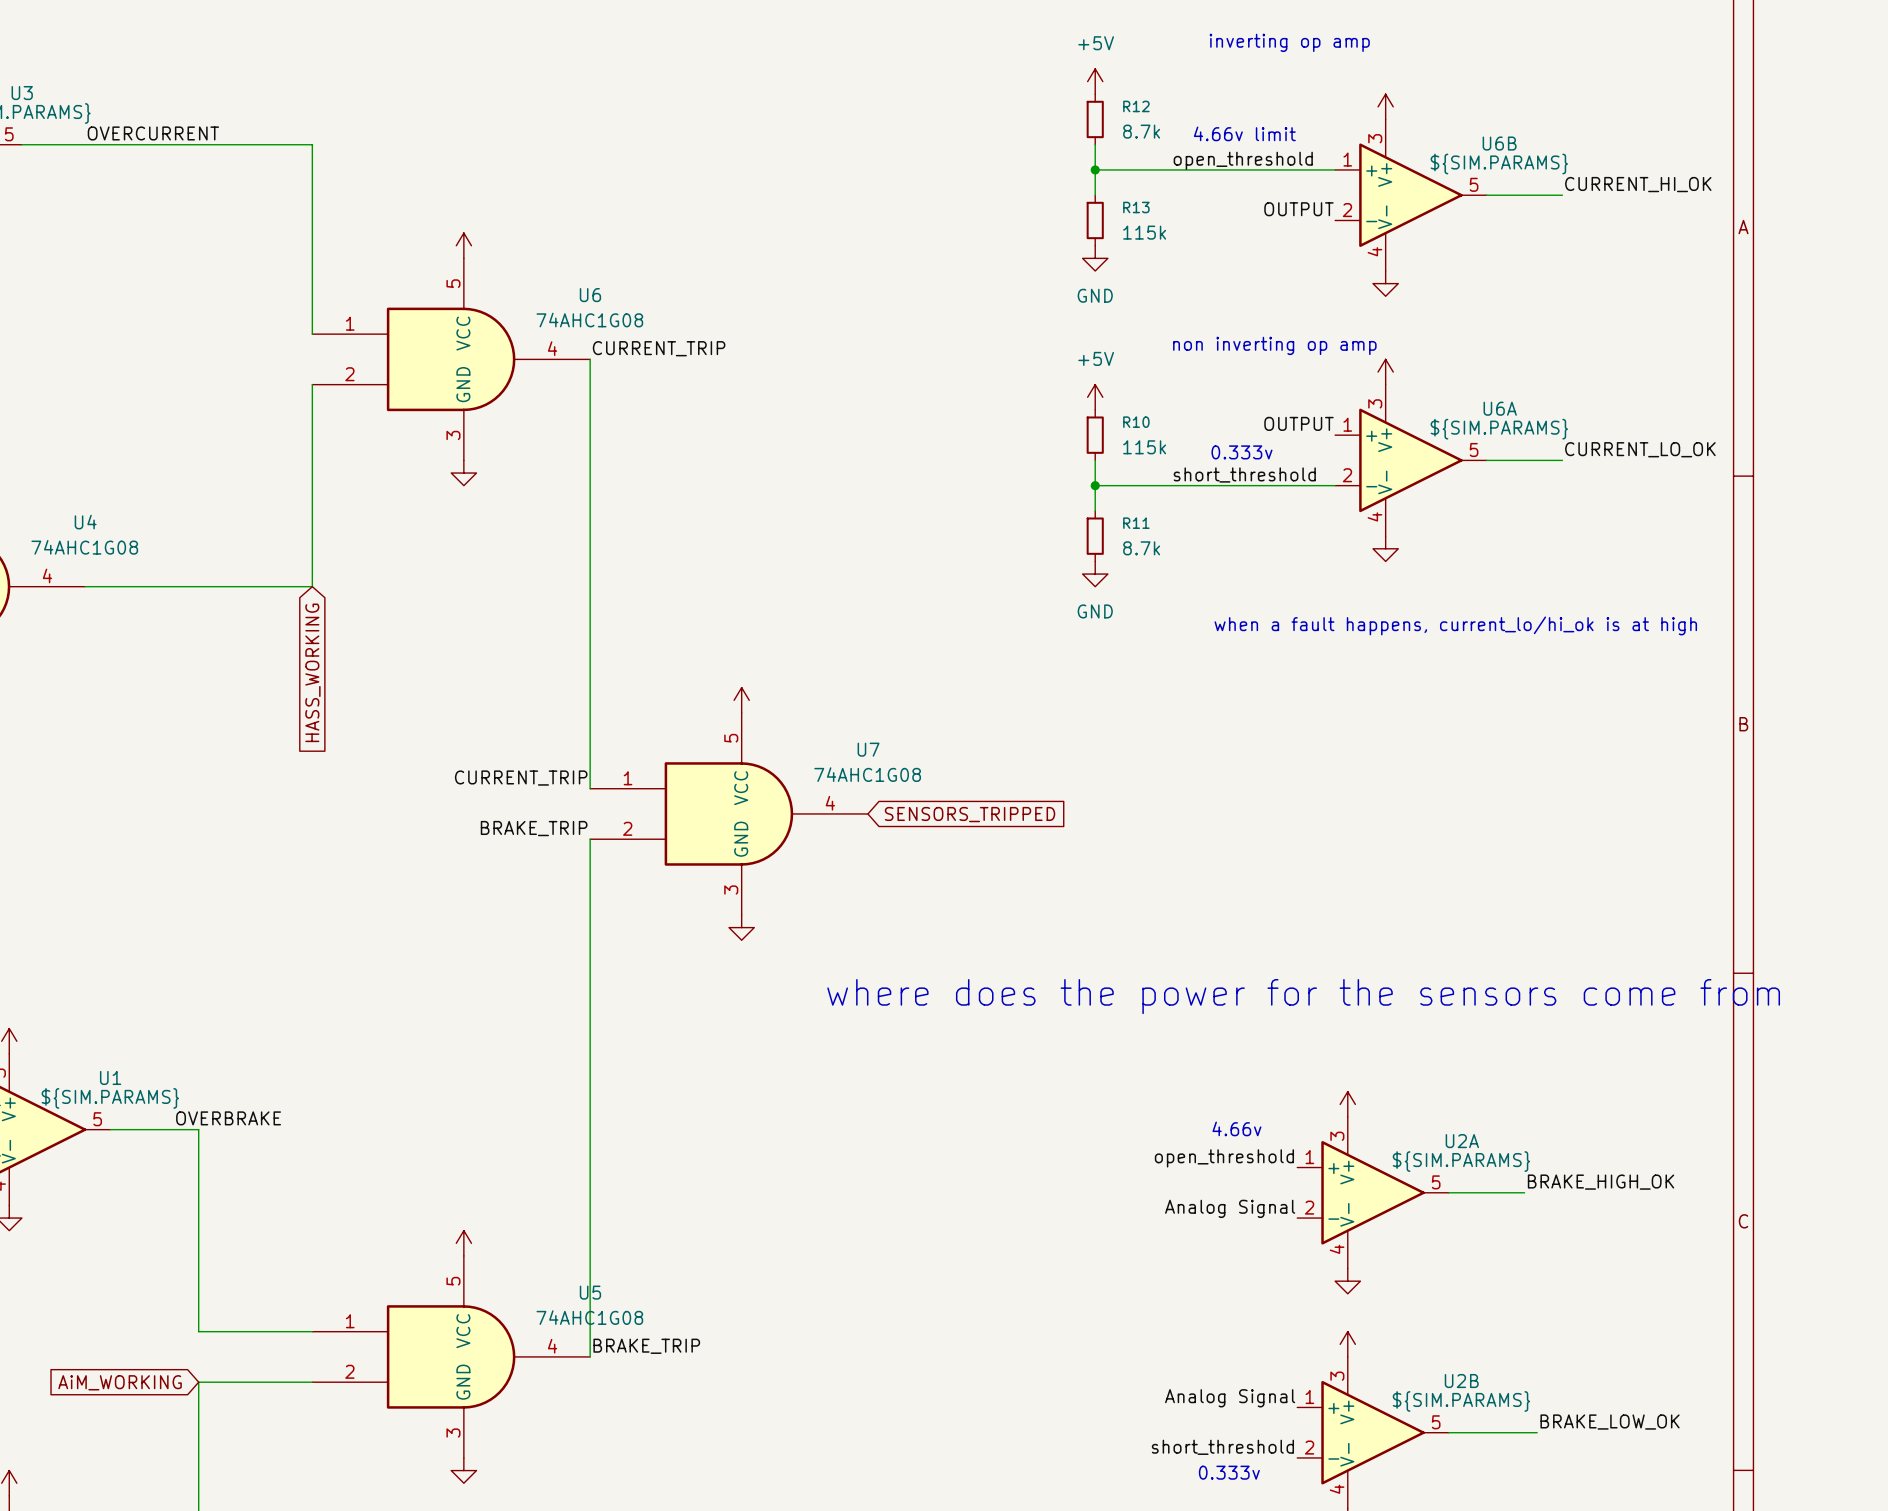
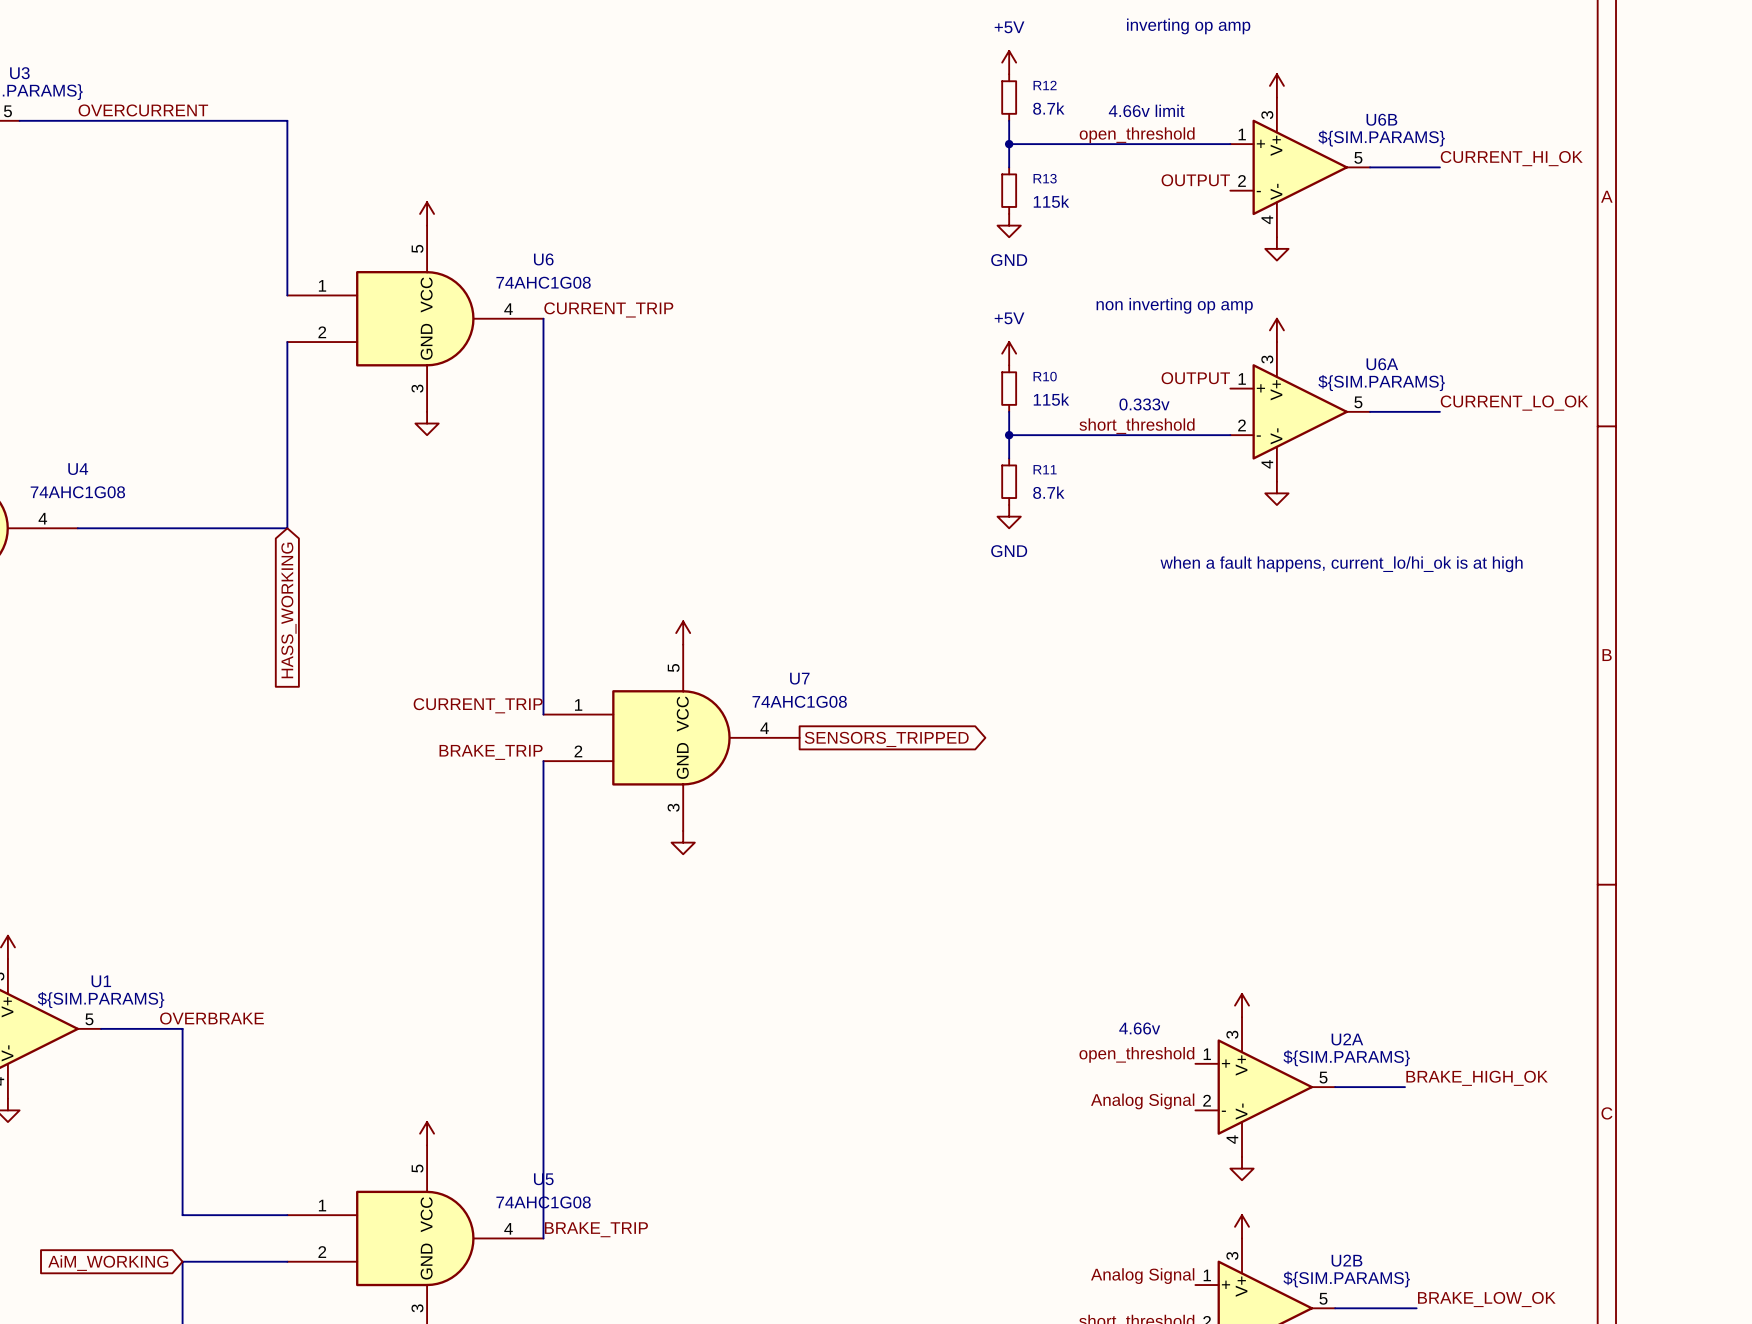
global label shape: input (970, 814) -> output (886, 739)
text: where does the power for the sensors come from (1303, 996) -> none

